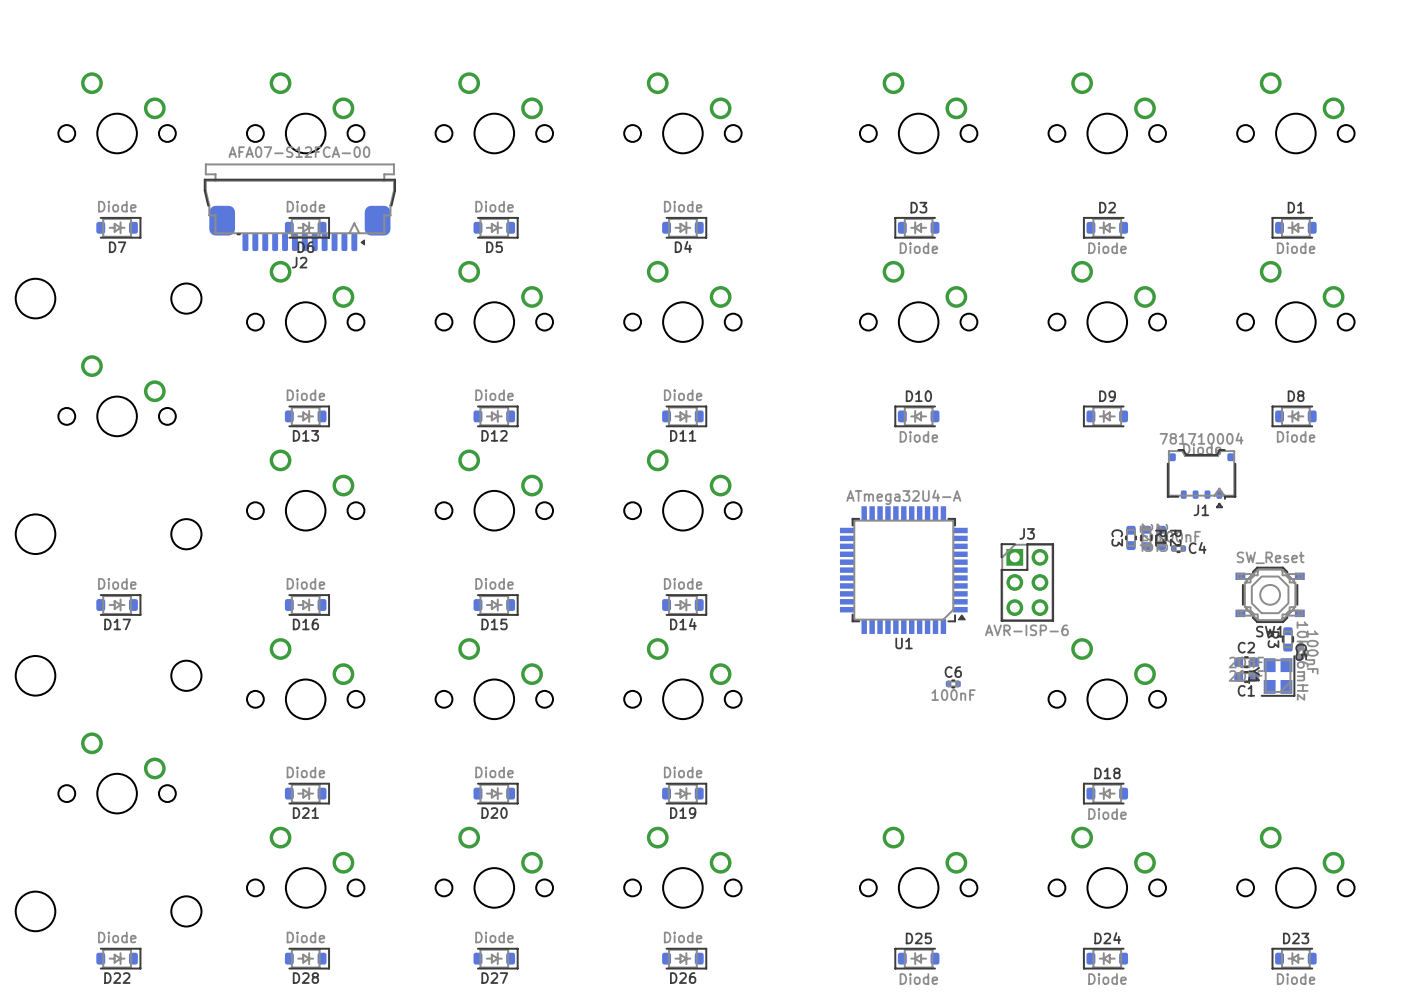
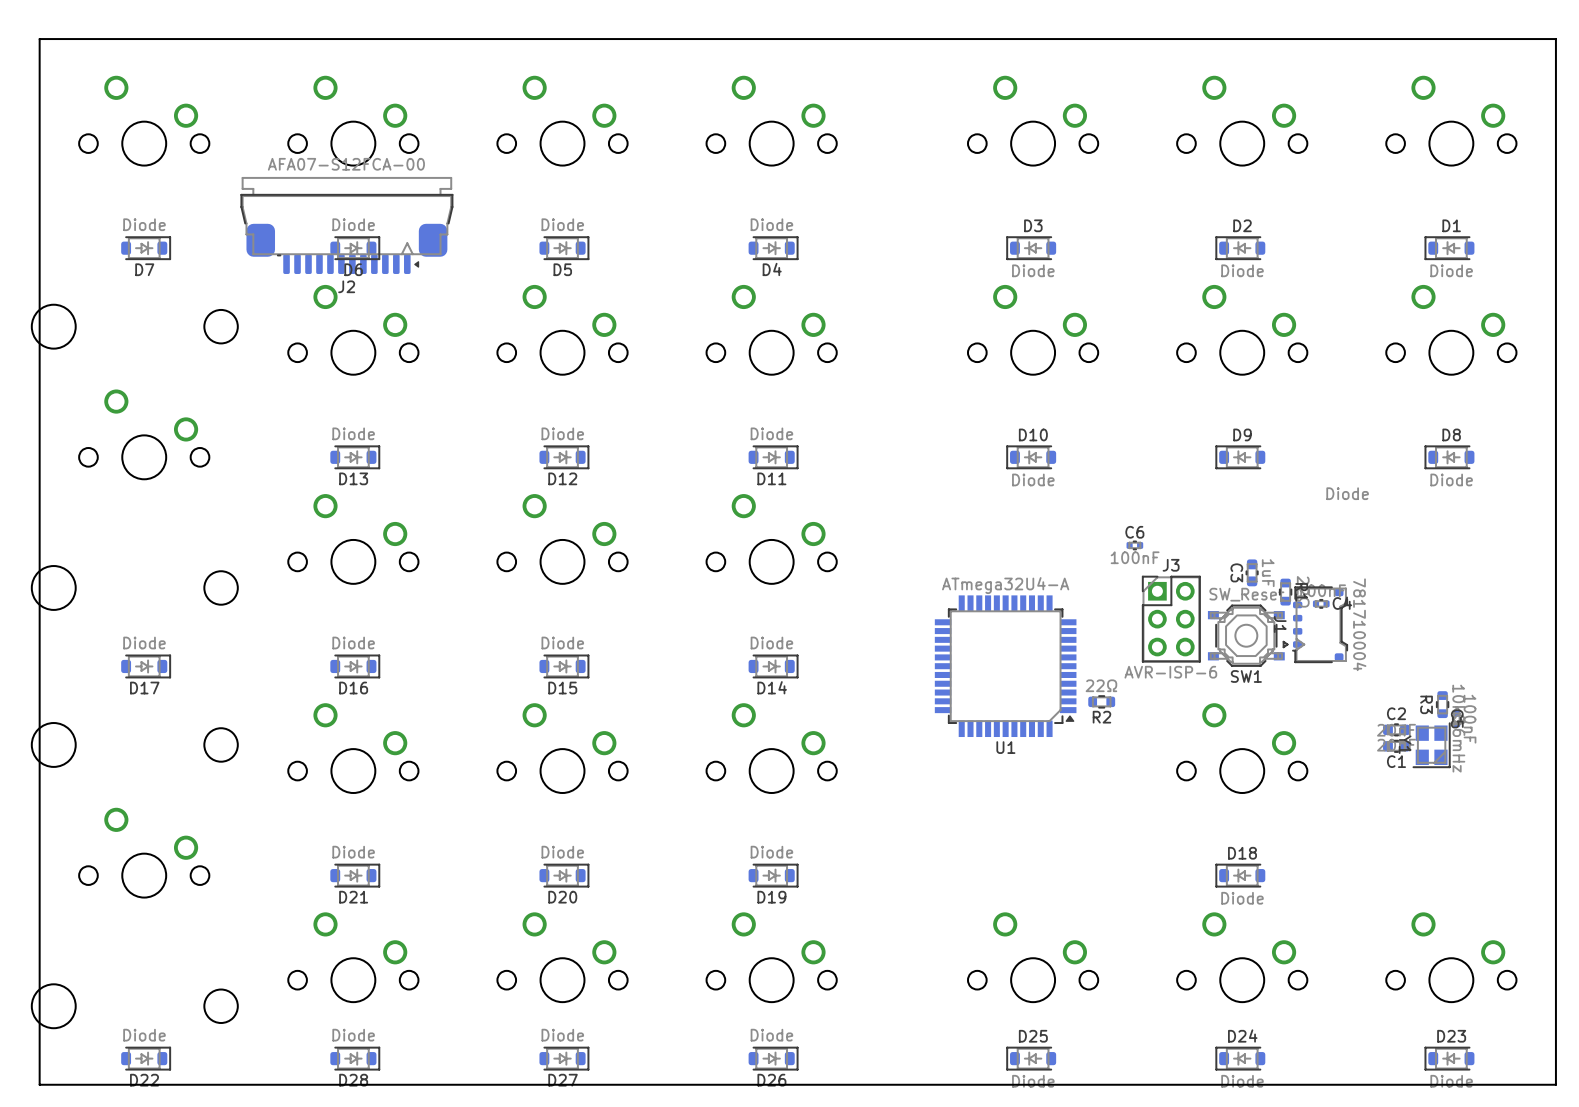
board edge: none -> (1555, 39) (1555, 1084) (39, 1084) (39, 39) (1555, 39)
J1 rotation: 0° (1201, 478) -> 90° clockwise (1315, 624)
J1 position: (1201, 478) -> (1315, 624)
C3 position: (1131, 537) -> (1252, 572)
R2 rotation: 0° (1161, 537) -> 90° clockwise (1101, 701)
R2 position: (1161, 537) -> (1101, 701)
U1 position: (903, 570) -> (1005, 666)
J3 position: (1027, 582) -> (1171, 619)
SW1 position: (1270, 594) -> (1246, 635)
C6 position: (953, 683) -> (1134, 545)

